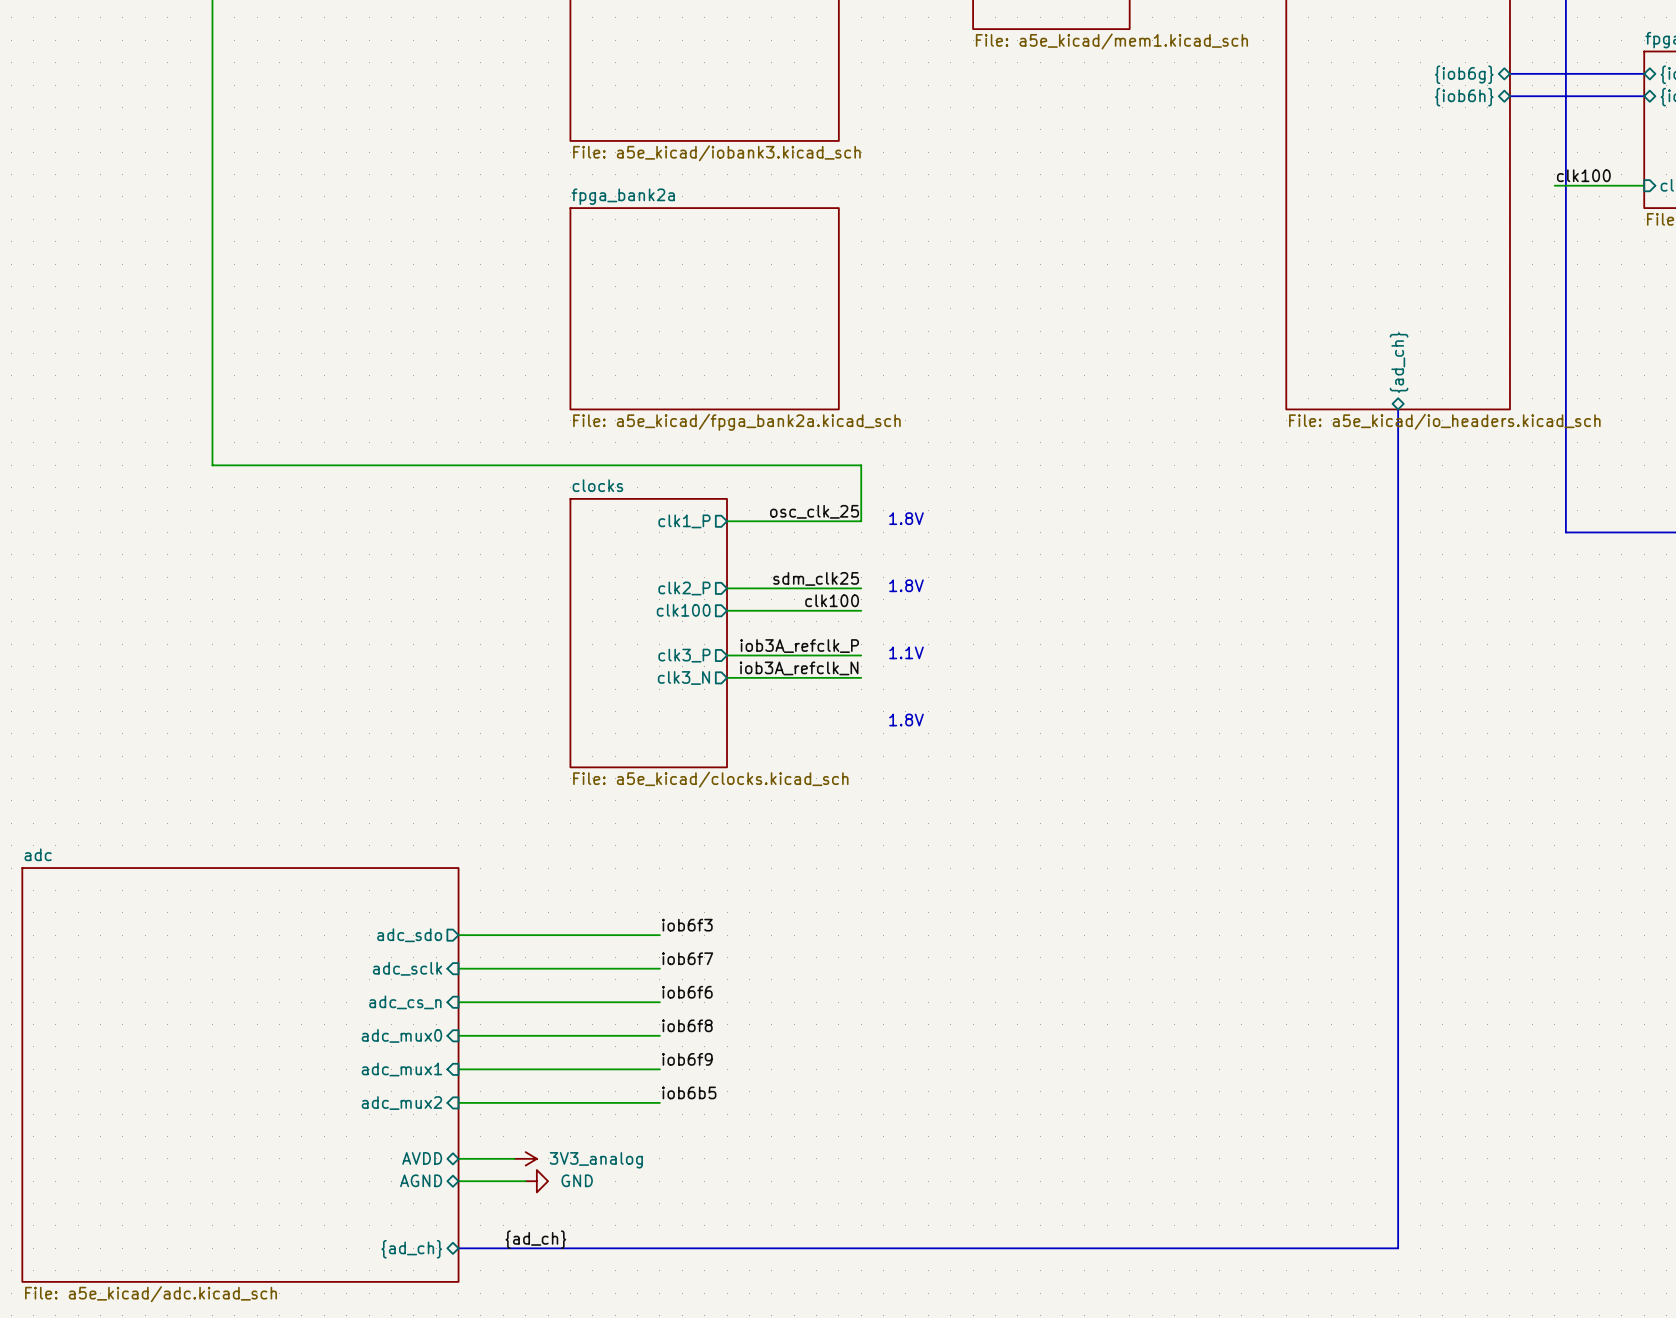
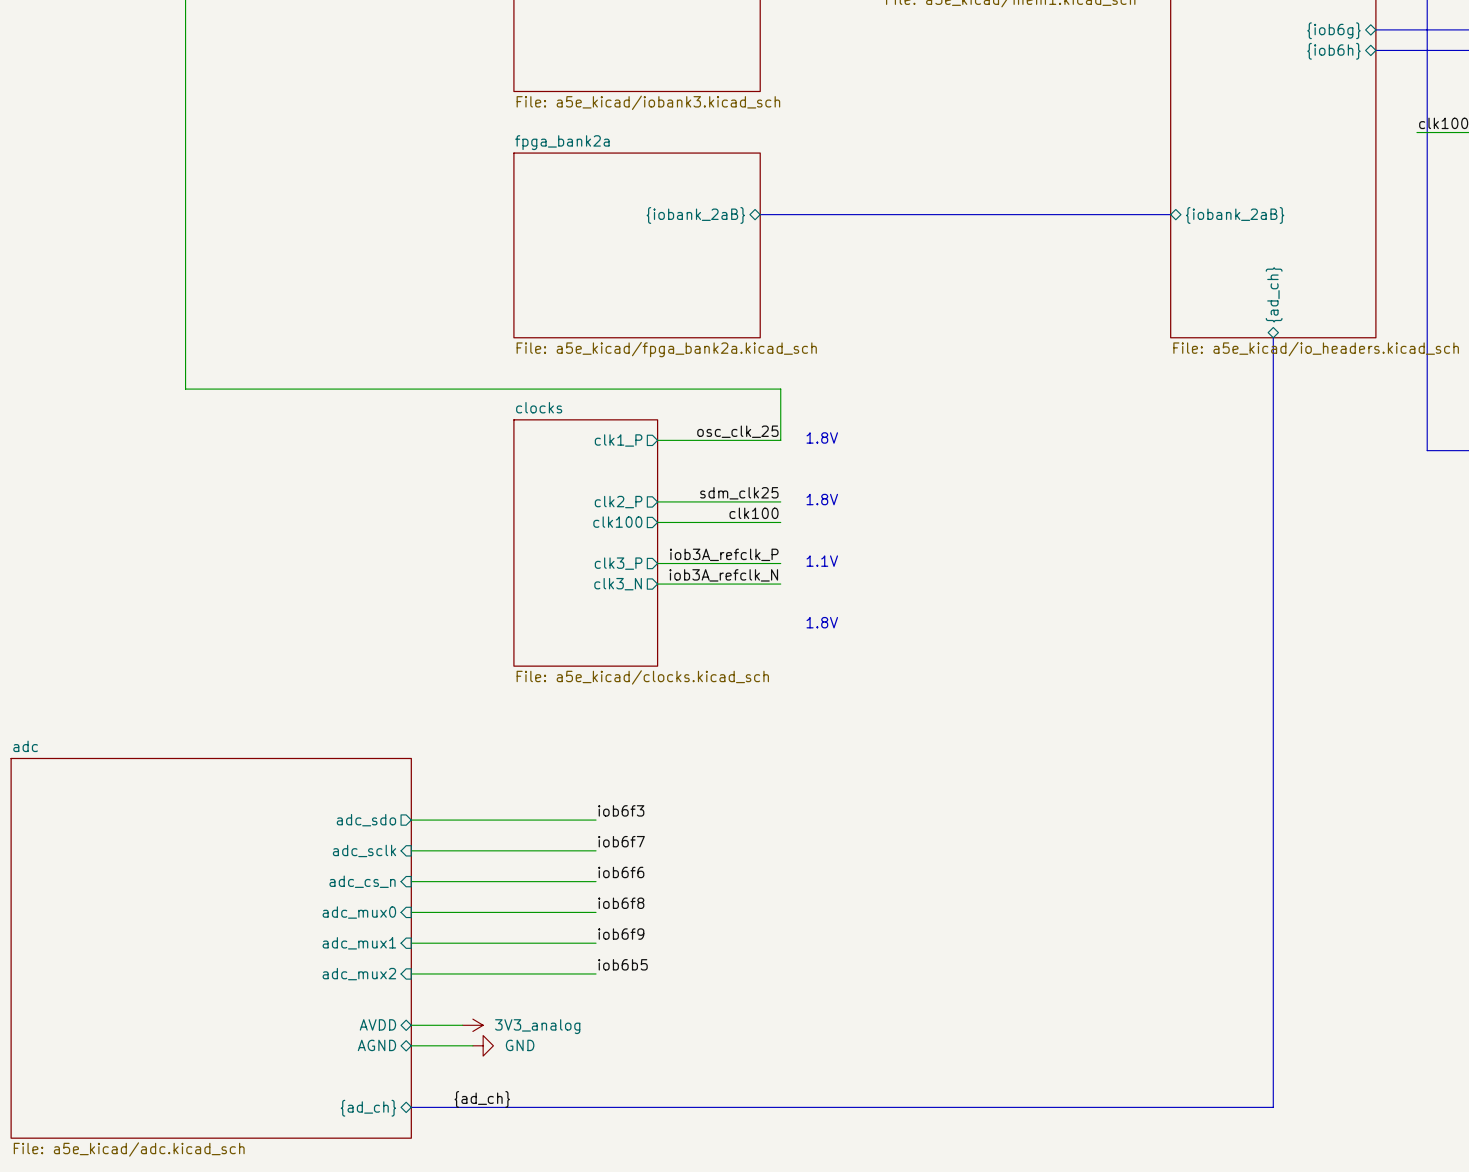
bus: none -> (760, 214) (1170, 214)
sheet pin: none -> {iobank_2aB} (695, 215)
sheet pin: none -> {iobank_2aB} (1235, 215)

